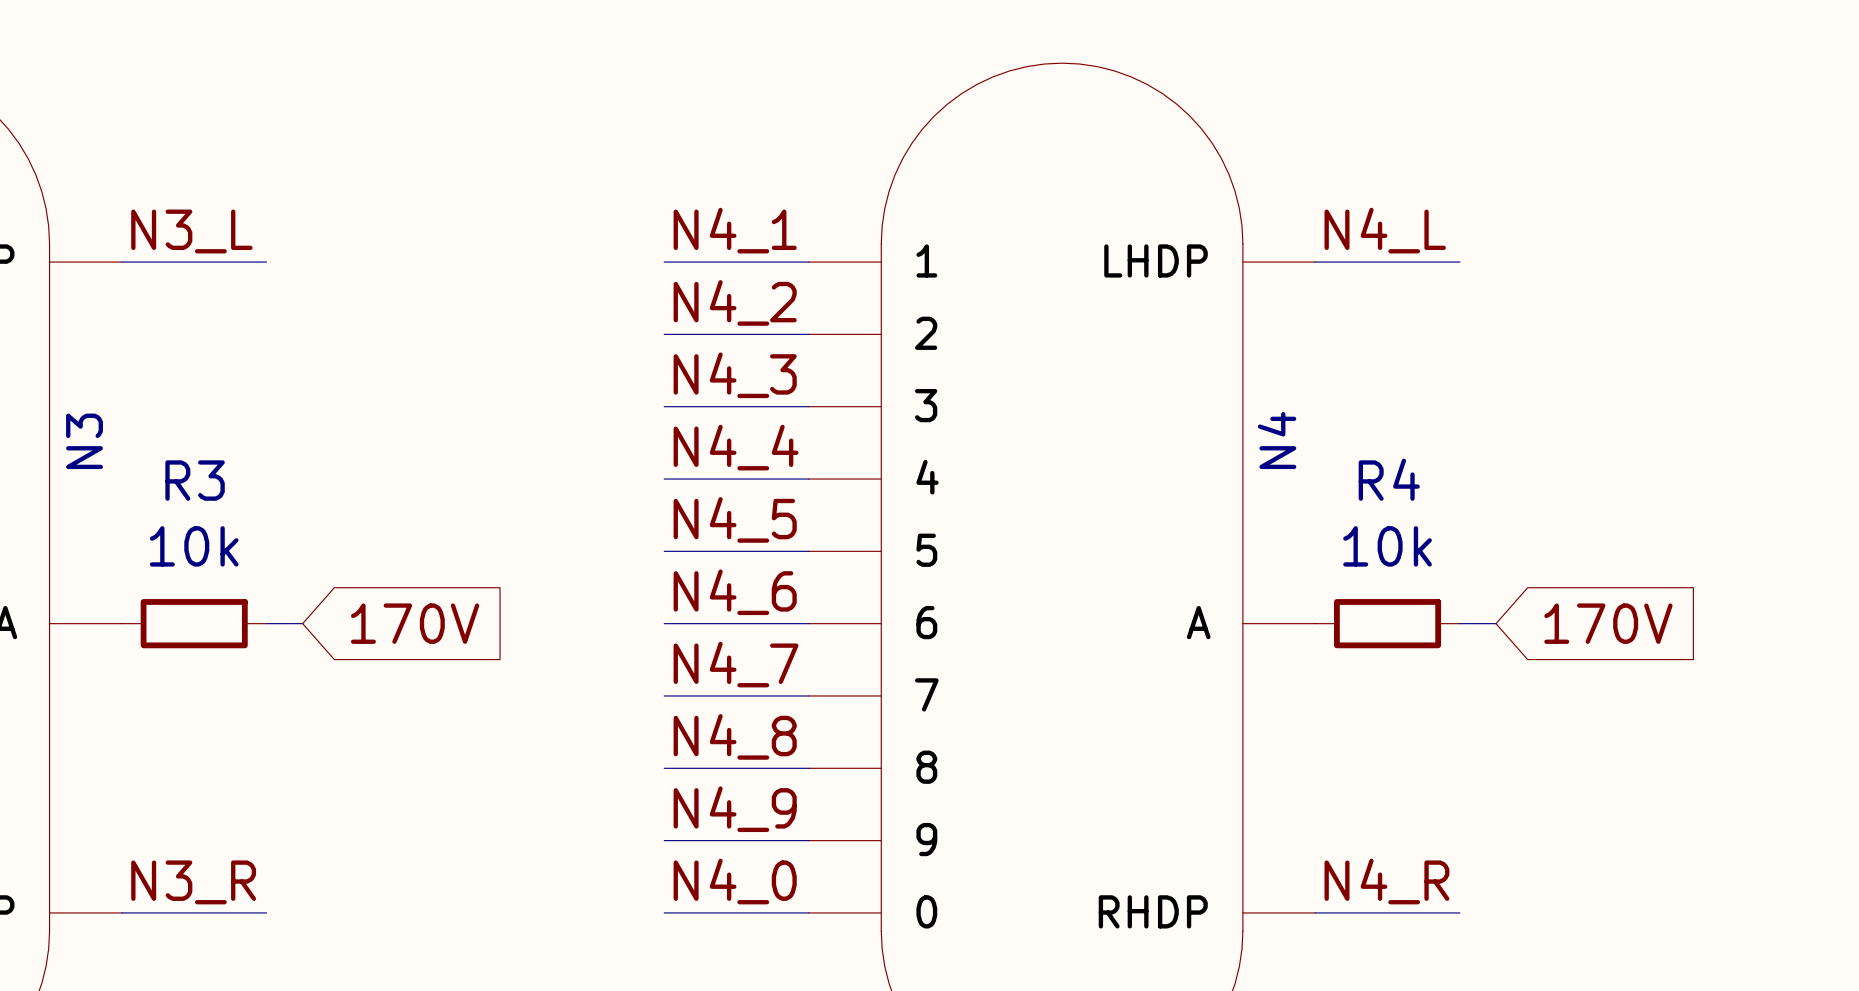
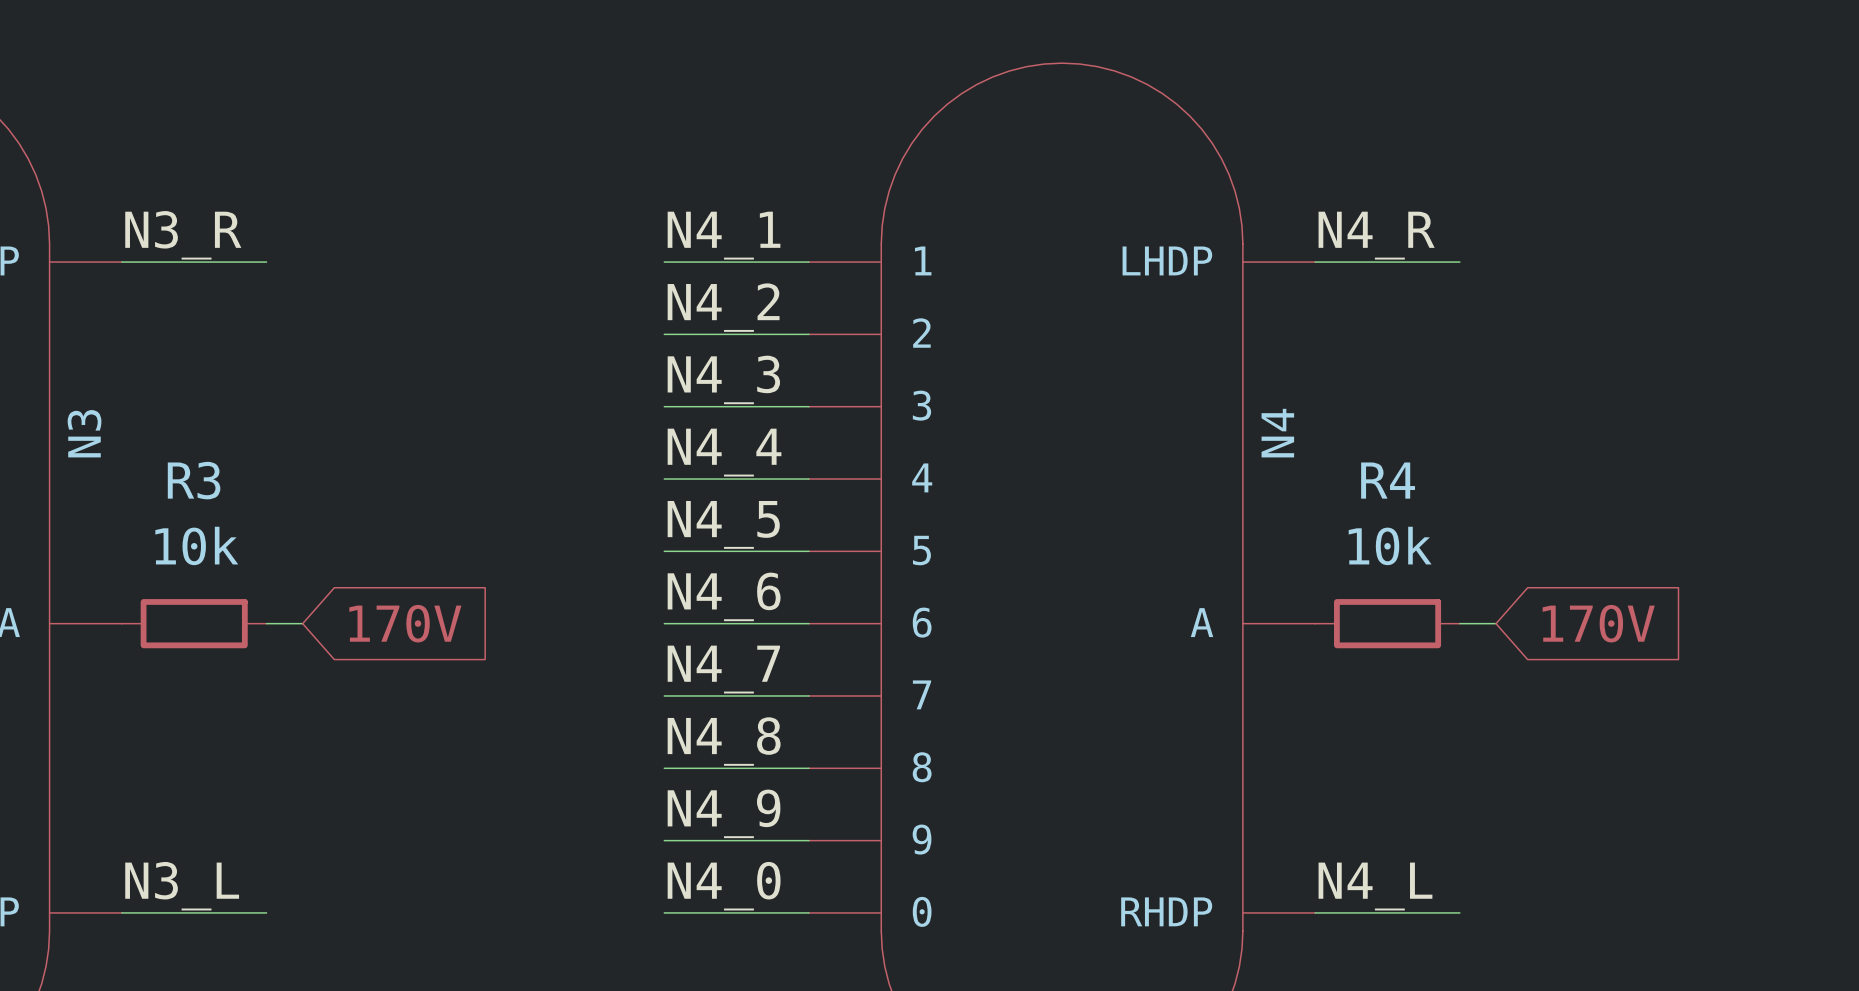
label: N4_L (1385, 230) -> N4_R (1376, 235)
label: N3_L (191, 231) -> N3_R (183, 235)
label: N4_R (1386, 881) -> N4_L (1375, 886)
label: N3_R (193, 882) -> N3_L (182, 886)

